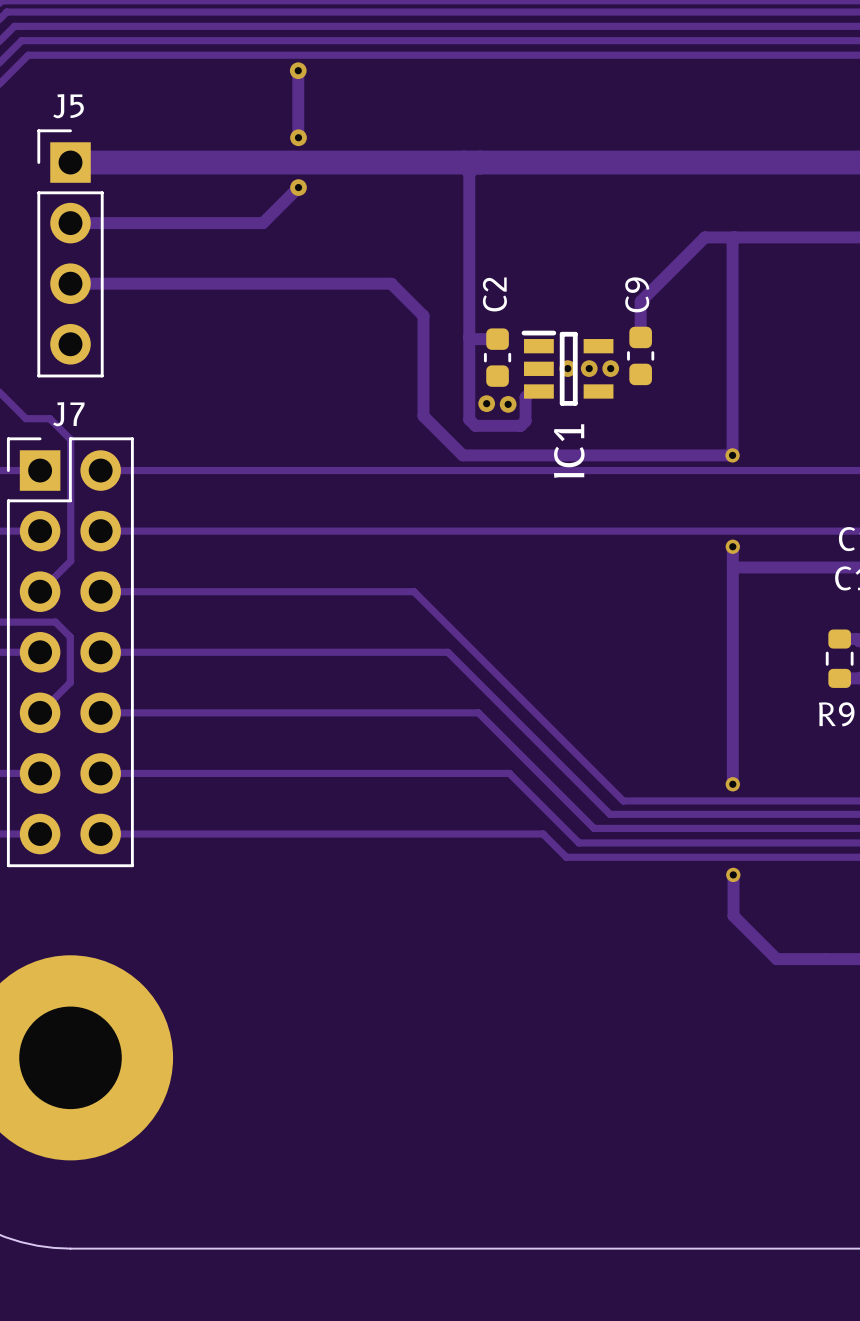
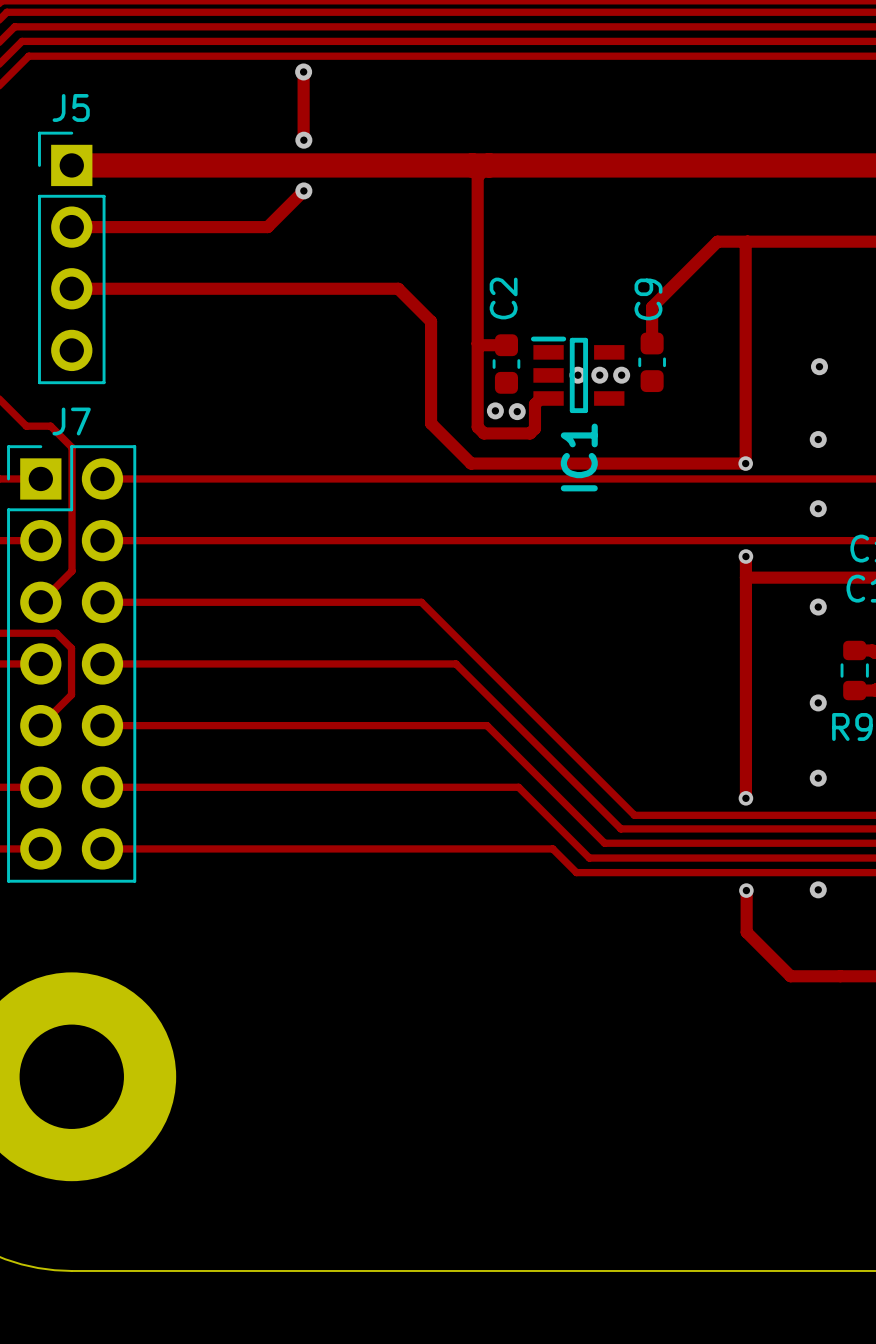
via: none -> (819, 366)
via: none -> (818, 439)
via: none -> (818, 508)
via: none -> (818, 607)
via: none -> (818, 702)
via: none -> (818, 778)
via: none -> (818, 889)

